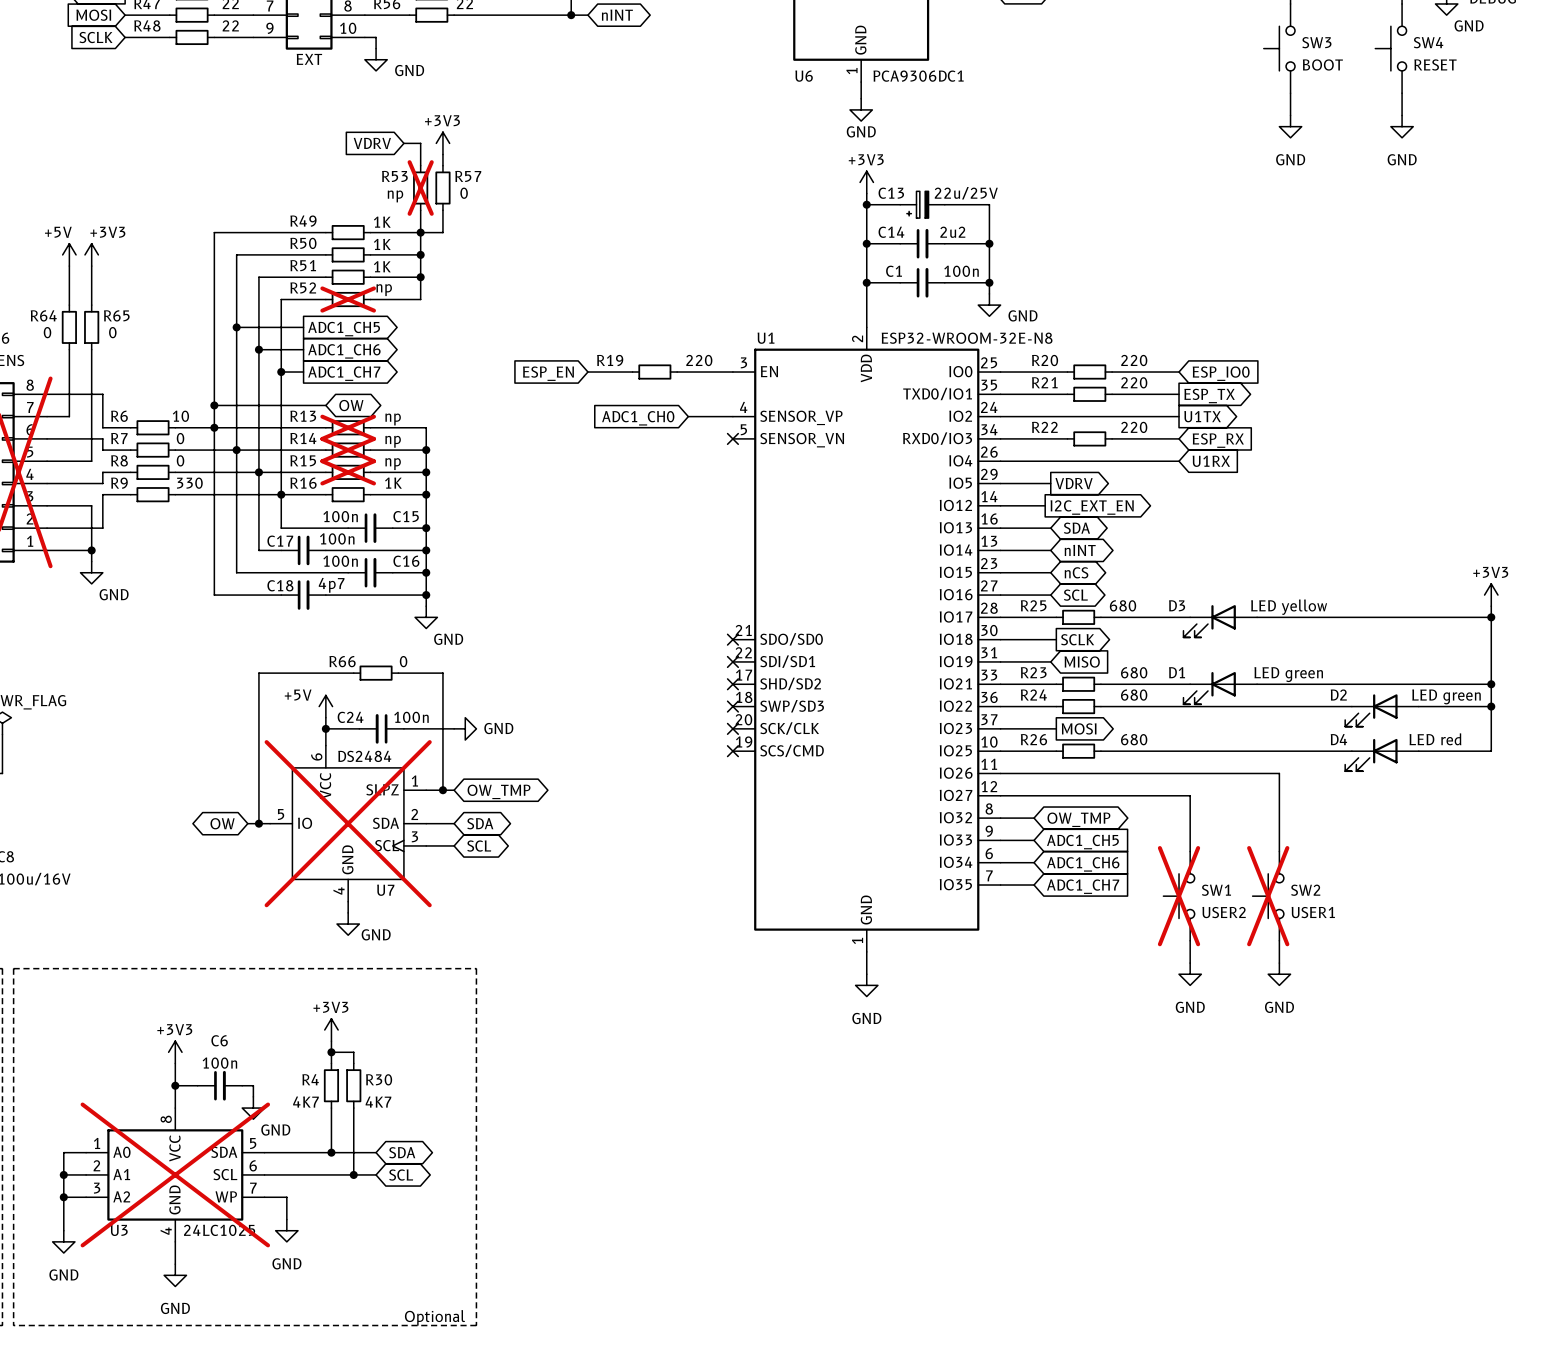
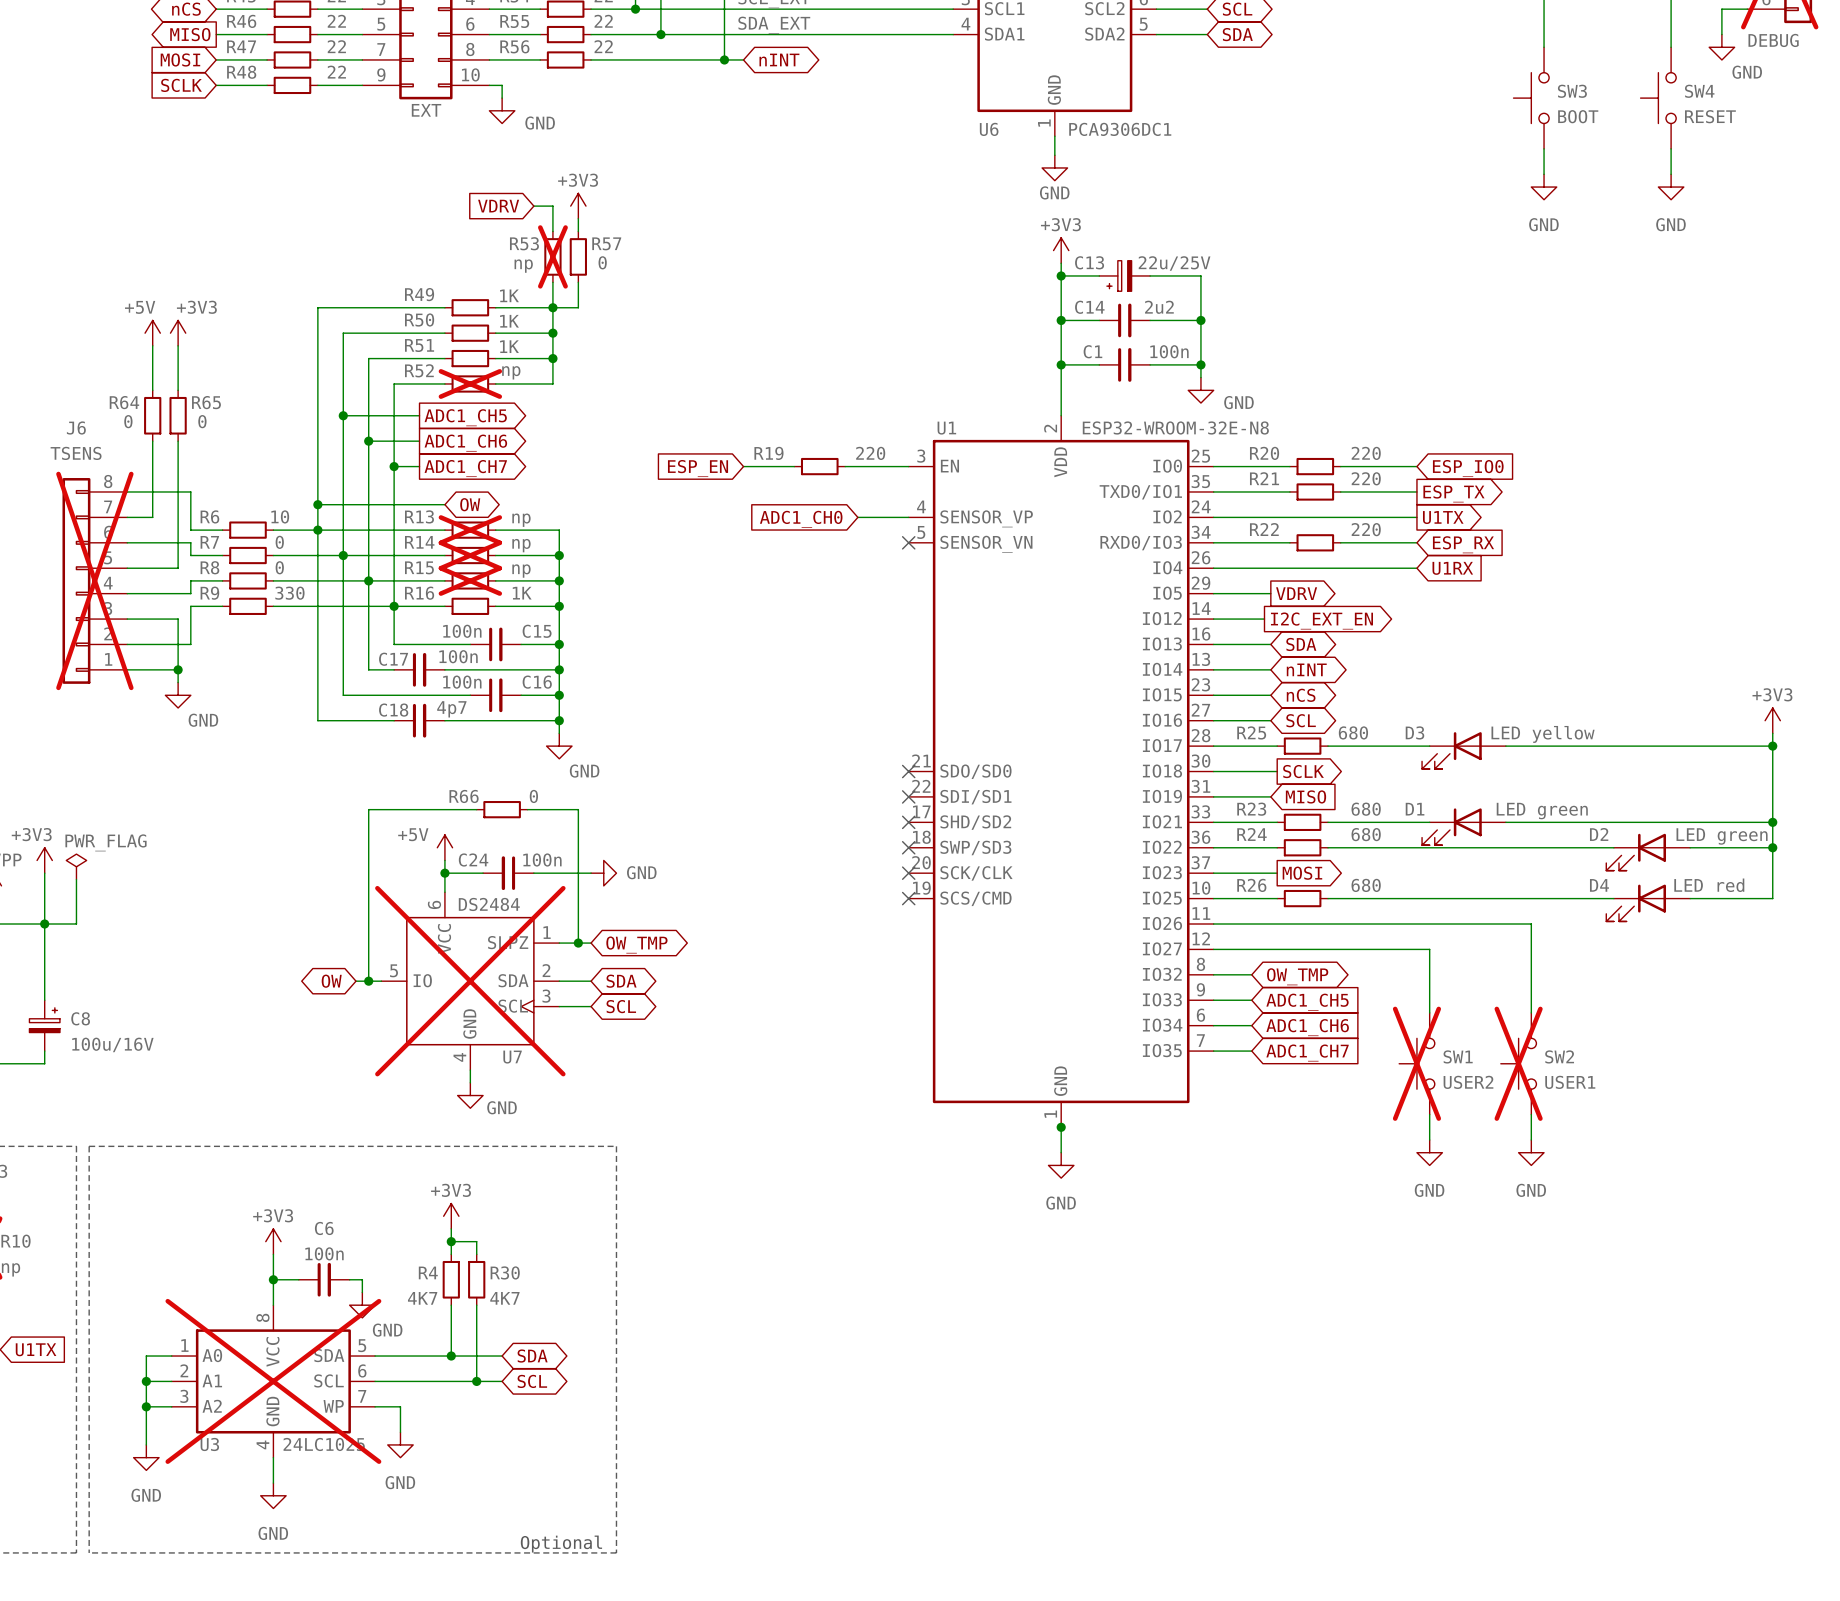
junction: none -> (1061, 1127)

